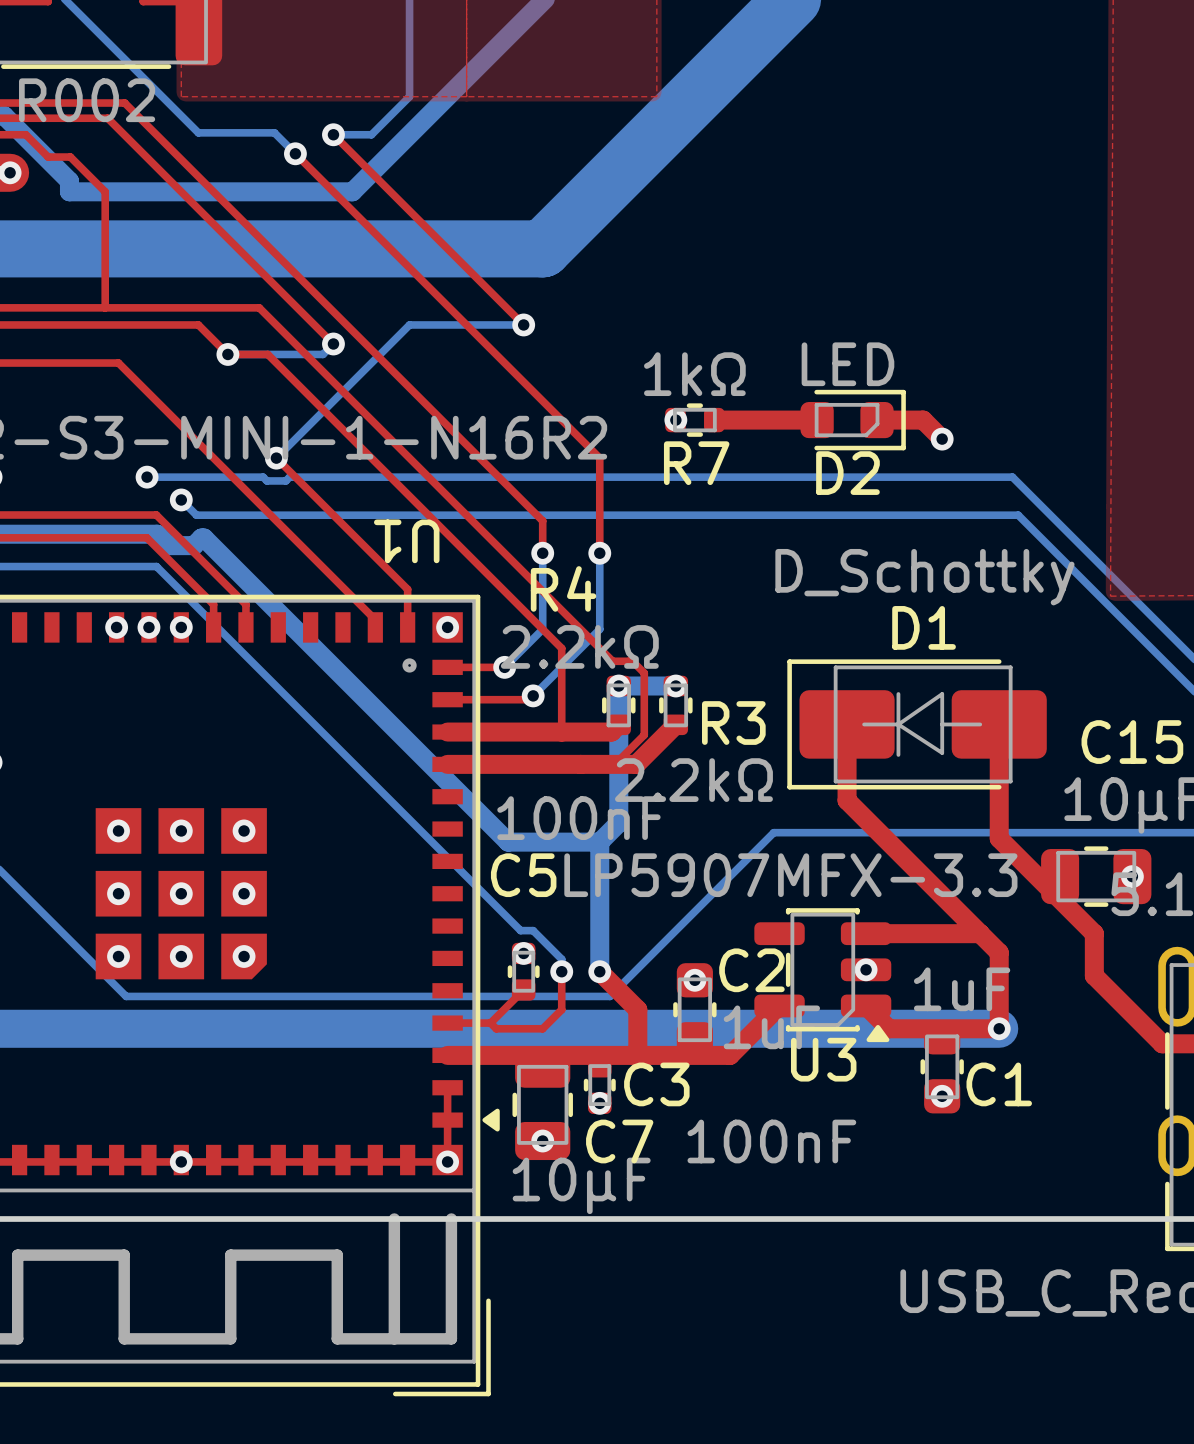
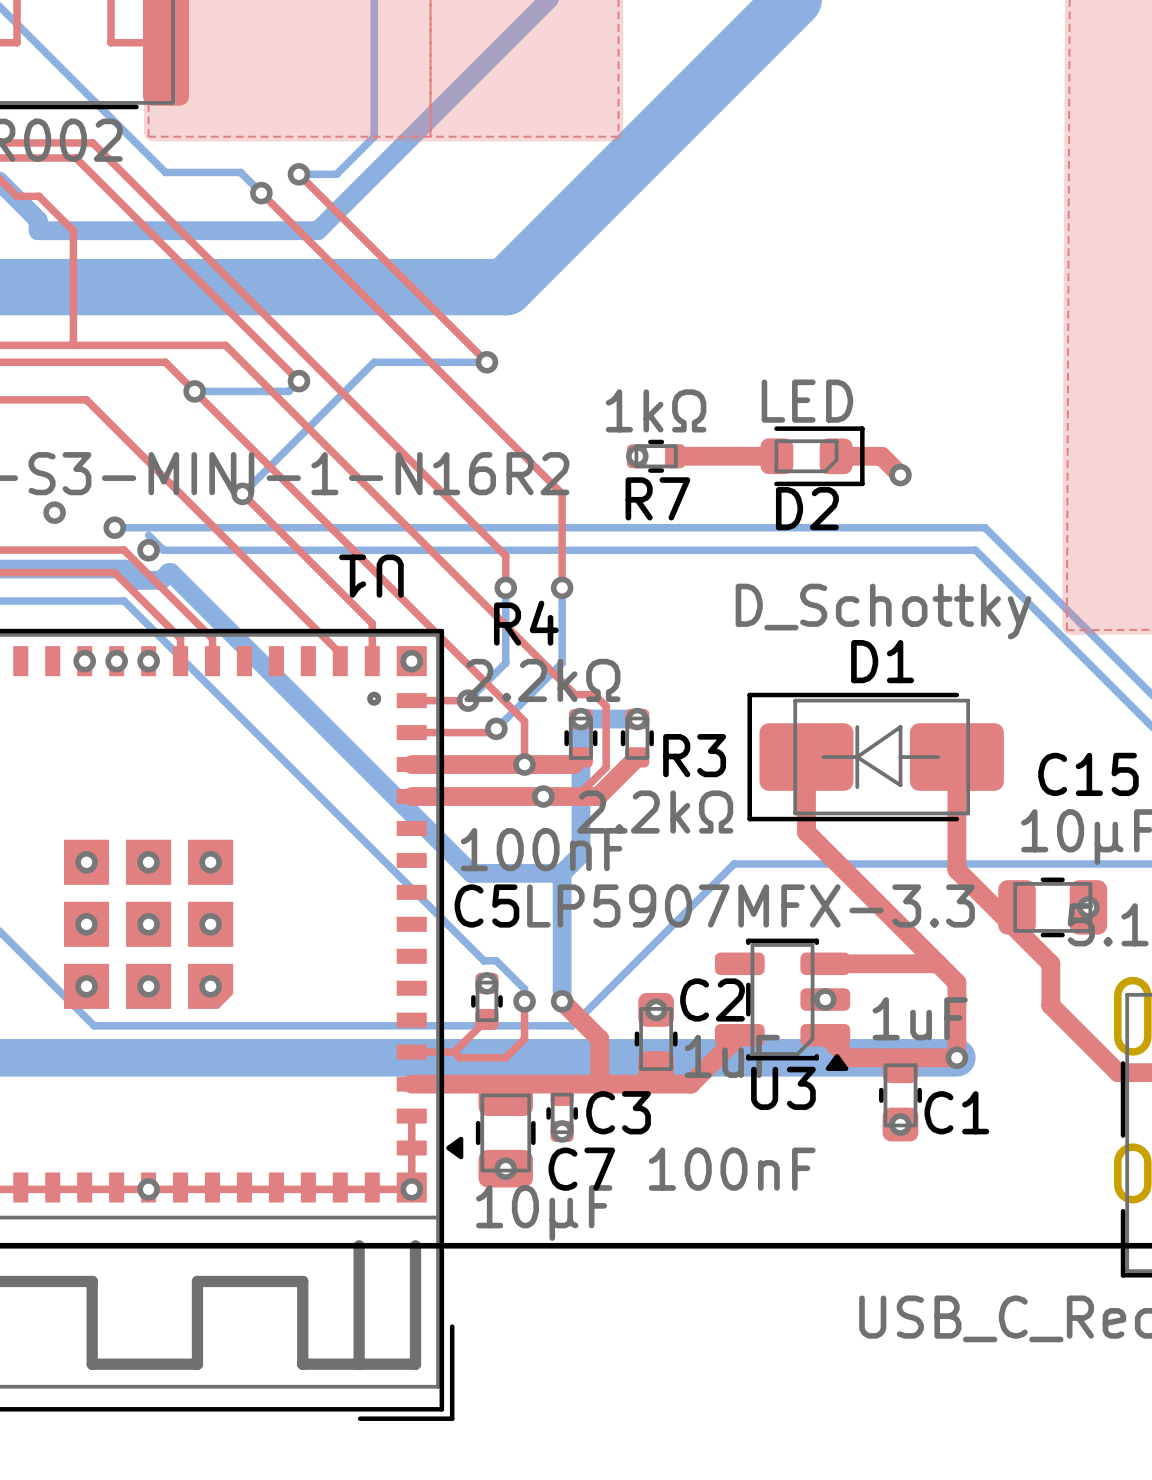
top track: (227, 354) (267, 354) (561, 648) (561, 688) -> (194, 391) (524, 721)
via: none -> (54, 512)
bottom track: (147, 477) (263, 477) (266, 480) (285, 480) (289, 477) (1012, 477) (1027, 492) -> (114, 527) (985, 527)
via position: (147, 477) -> (114, 527)
via position: (181, 499) -> (148, 550)
via: none -> (524, 764)
via: none -> (543, 796)

